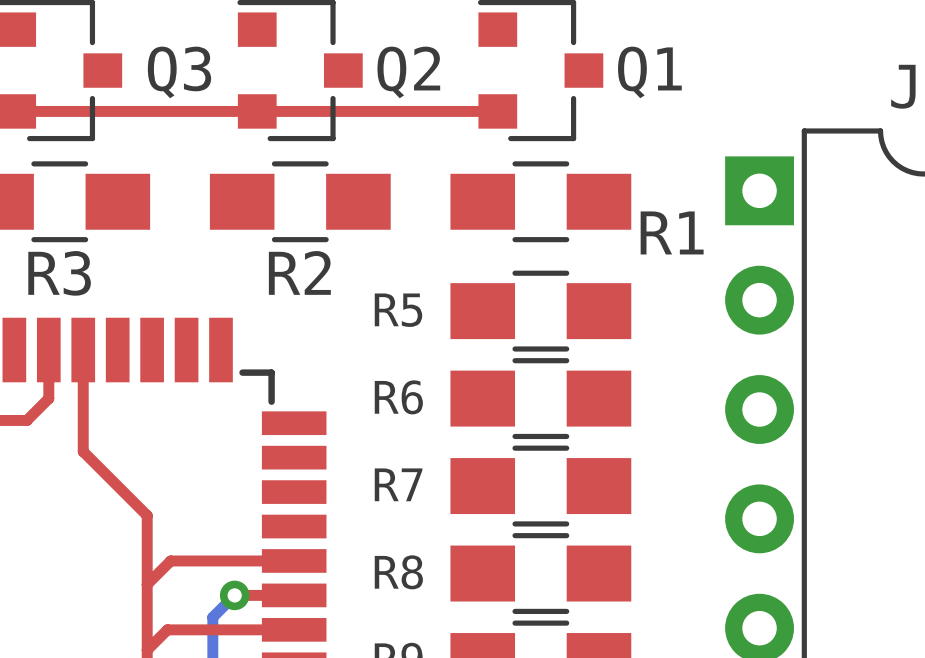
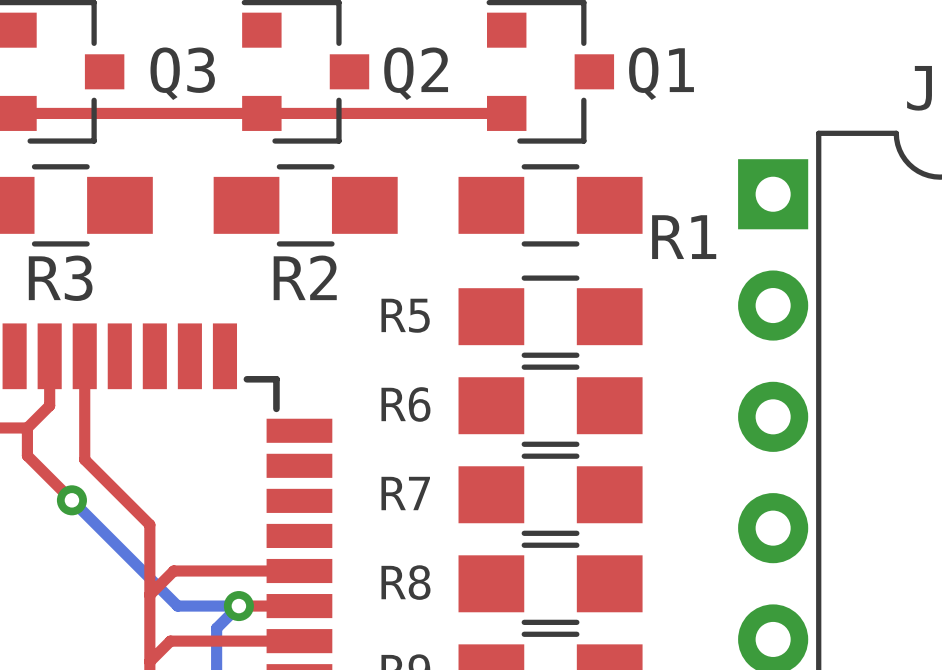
top track: none -> (27, 427) (27, 455) (71, 500)
bottom track: none -> (71, 500) (177, 606) (238, 606)
via: none -> (71, 500)

